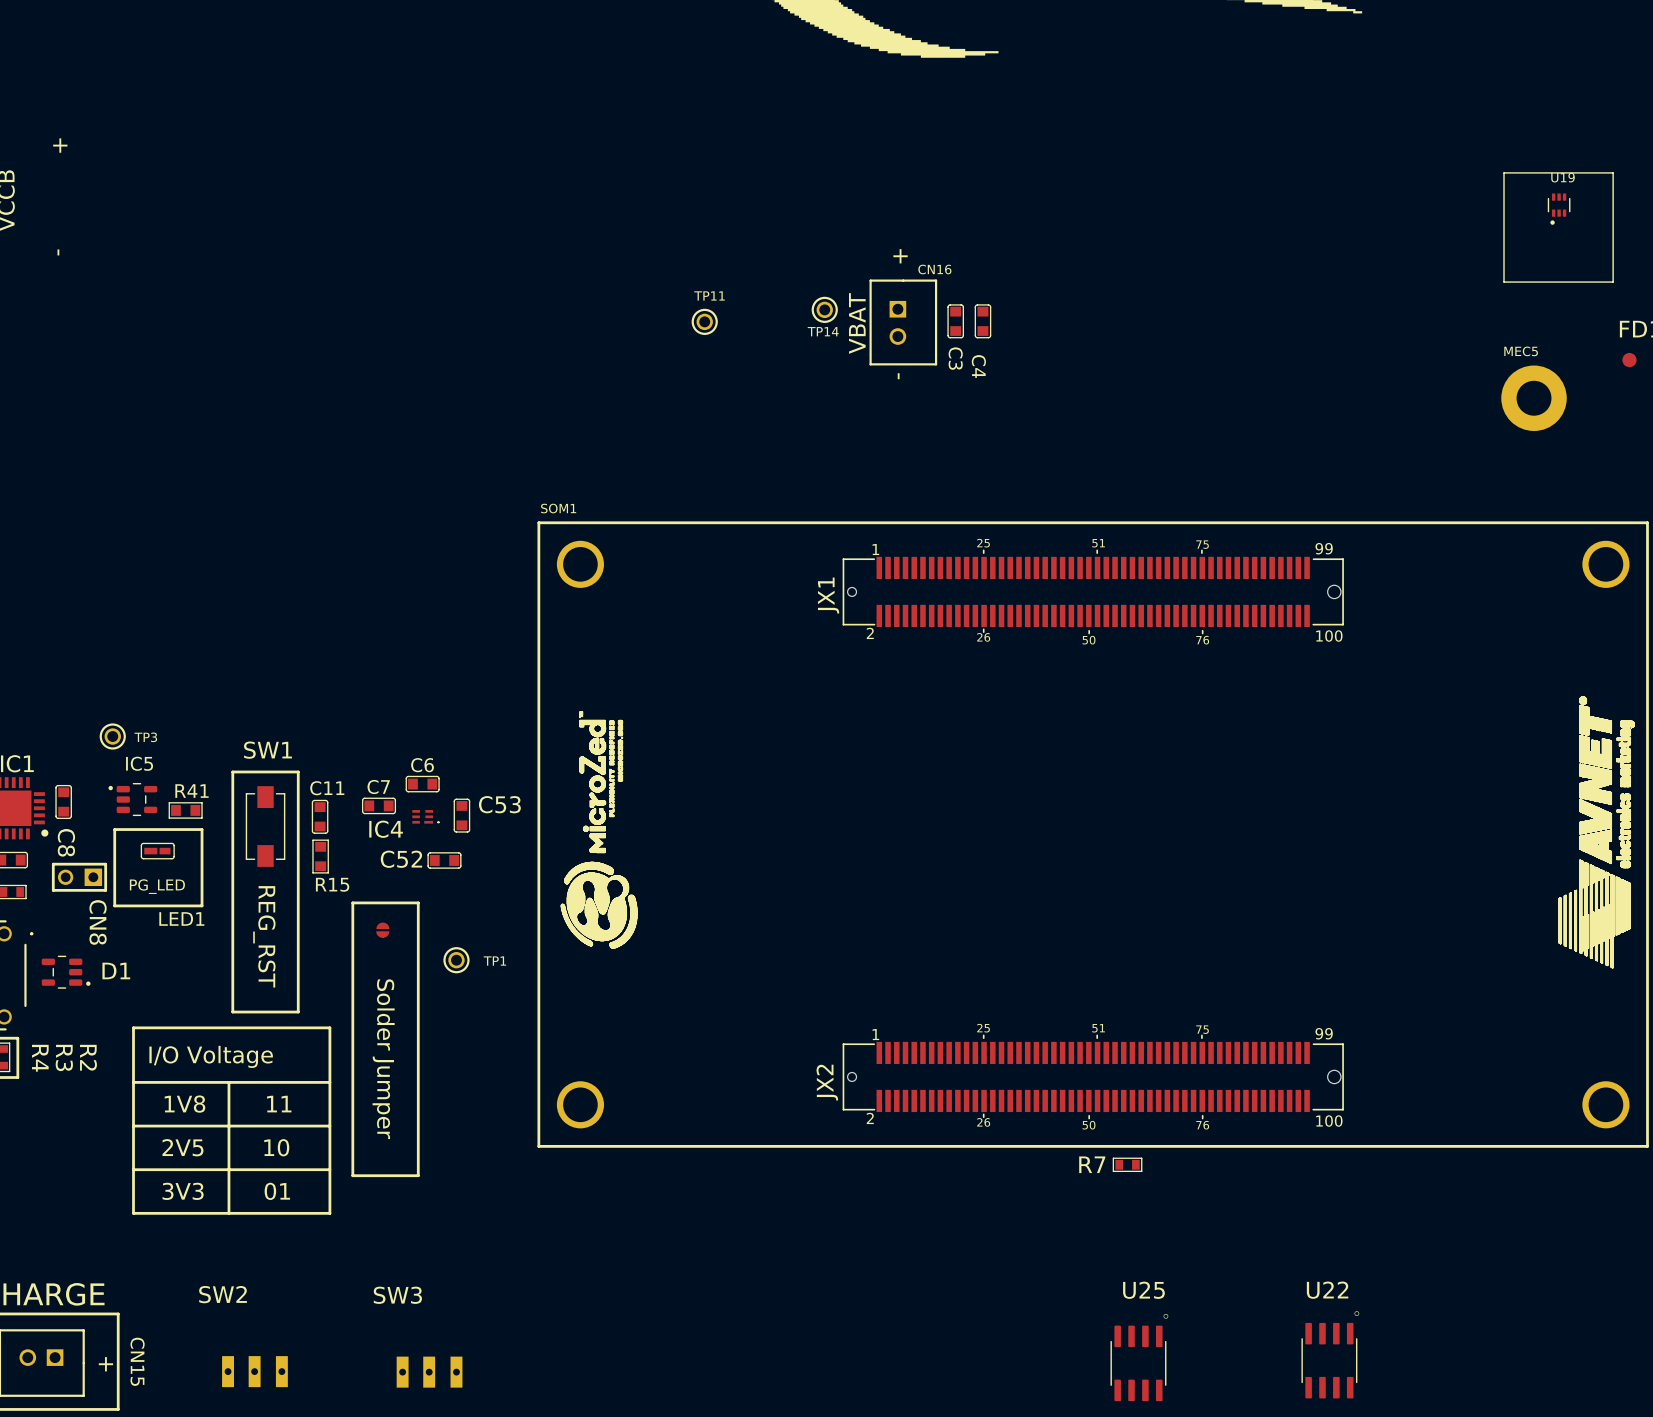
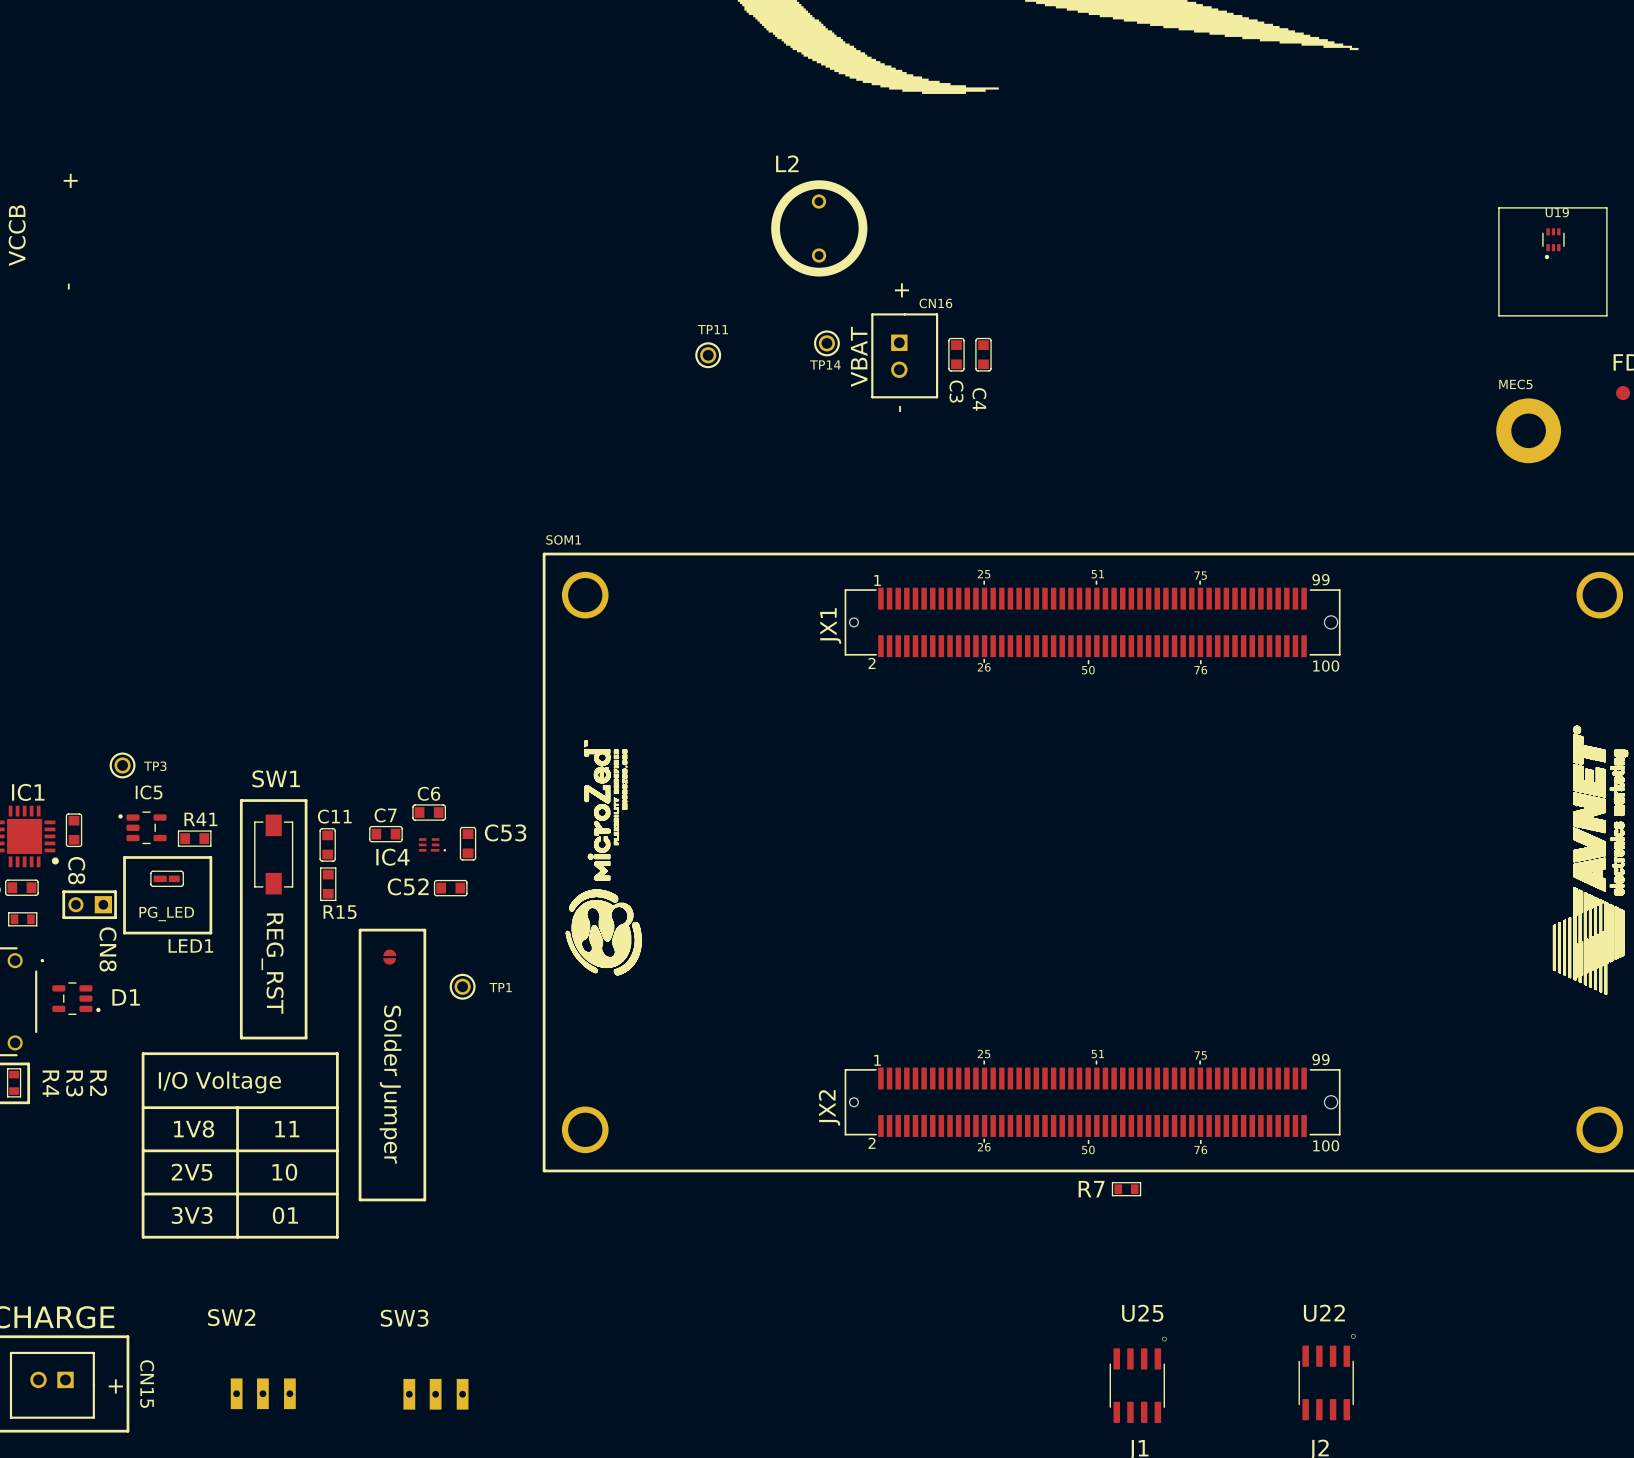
L2: none -> (819, 228)

